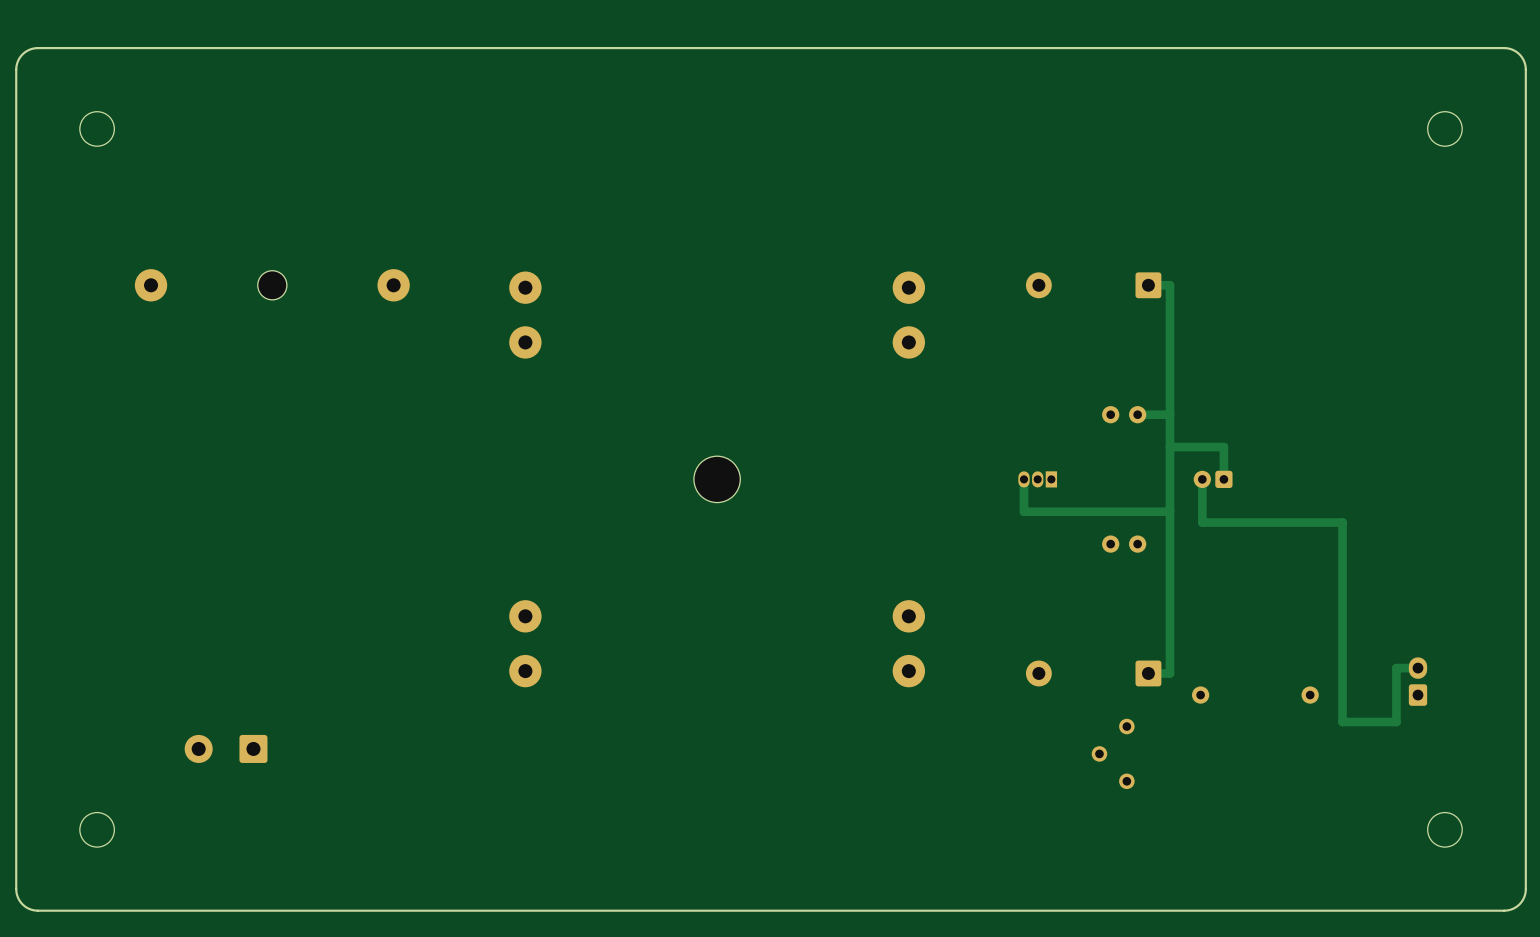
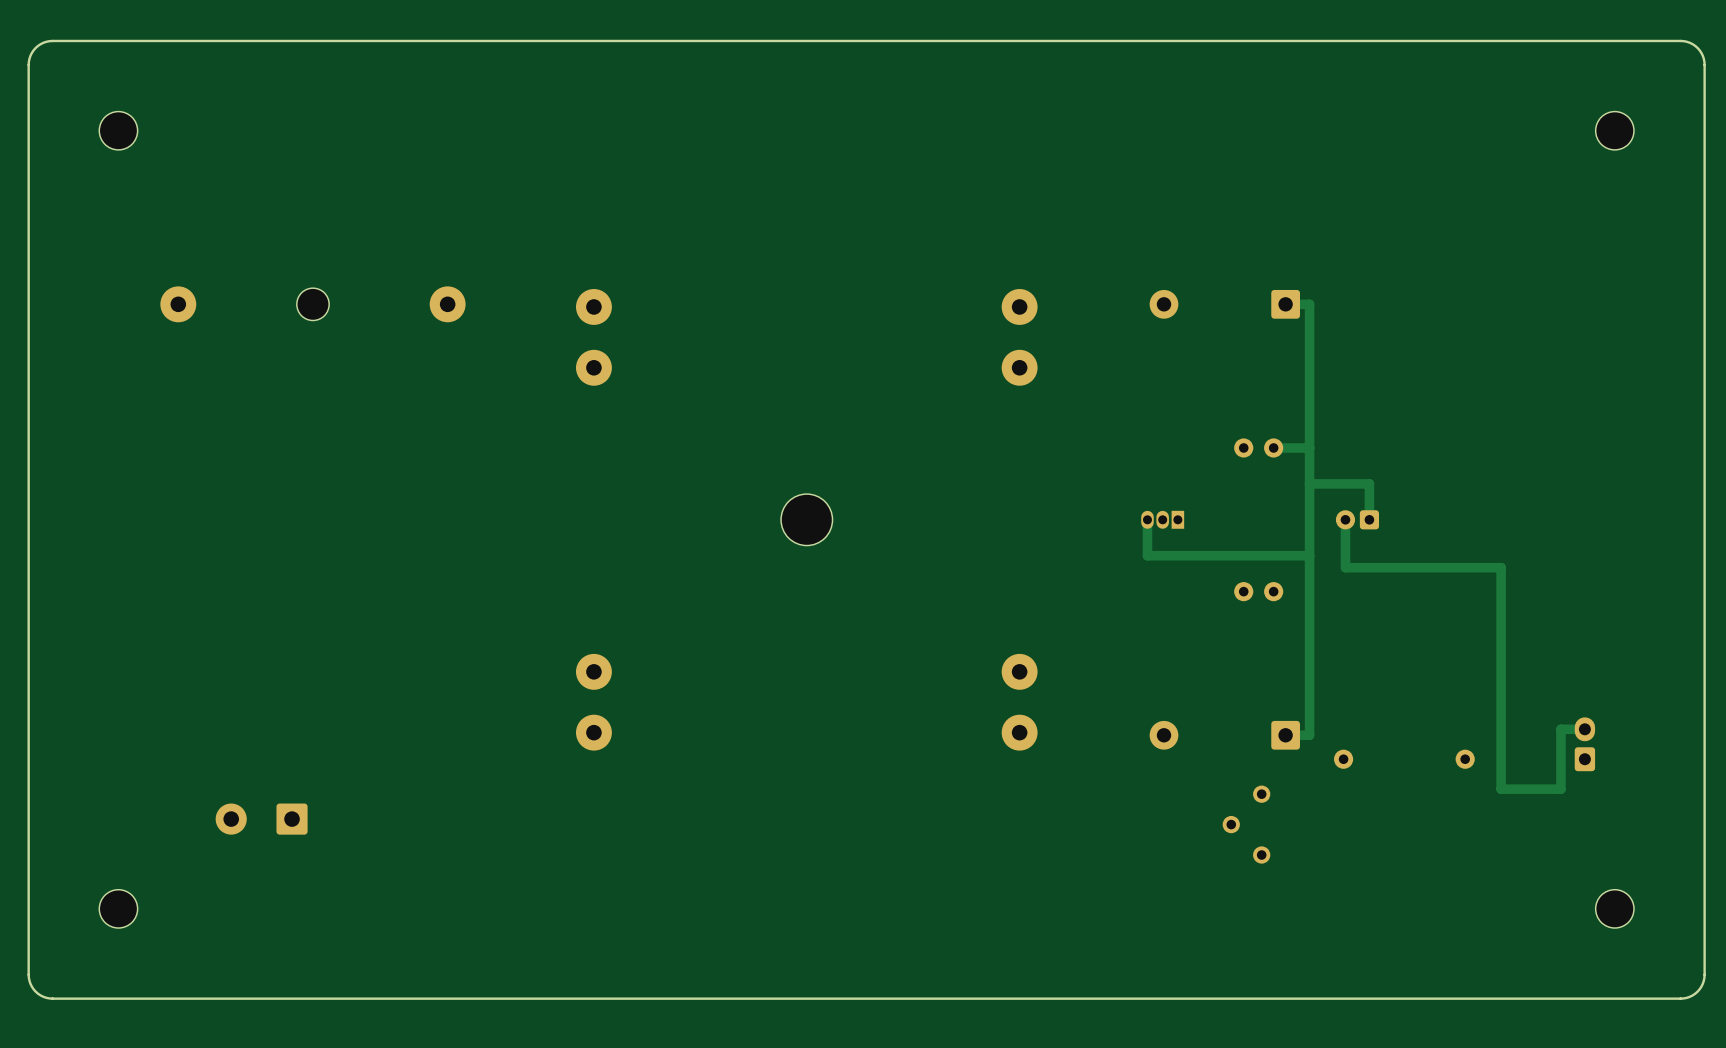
round board edge: [79, 111, 115, 147] -> none
round board edge: [1427, 111, 1463, 147] -> none
part: none -> (118, 130)
part: none -> (1614, 130)
round board edge: [79, 812, 115, 848] -> none
round board edge: [1427, 812, 1463, 848] -> none
part: none -> (118, 908)
part: none -> (1614, 908)

